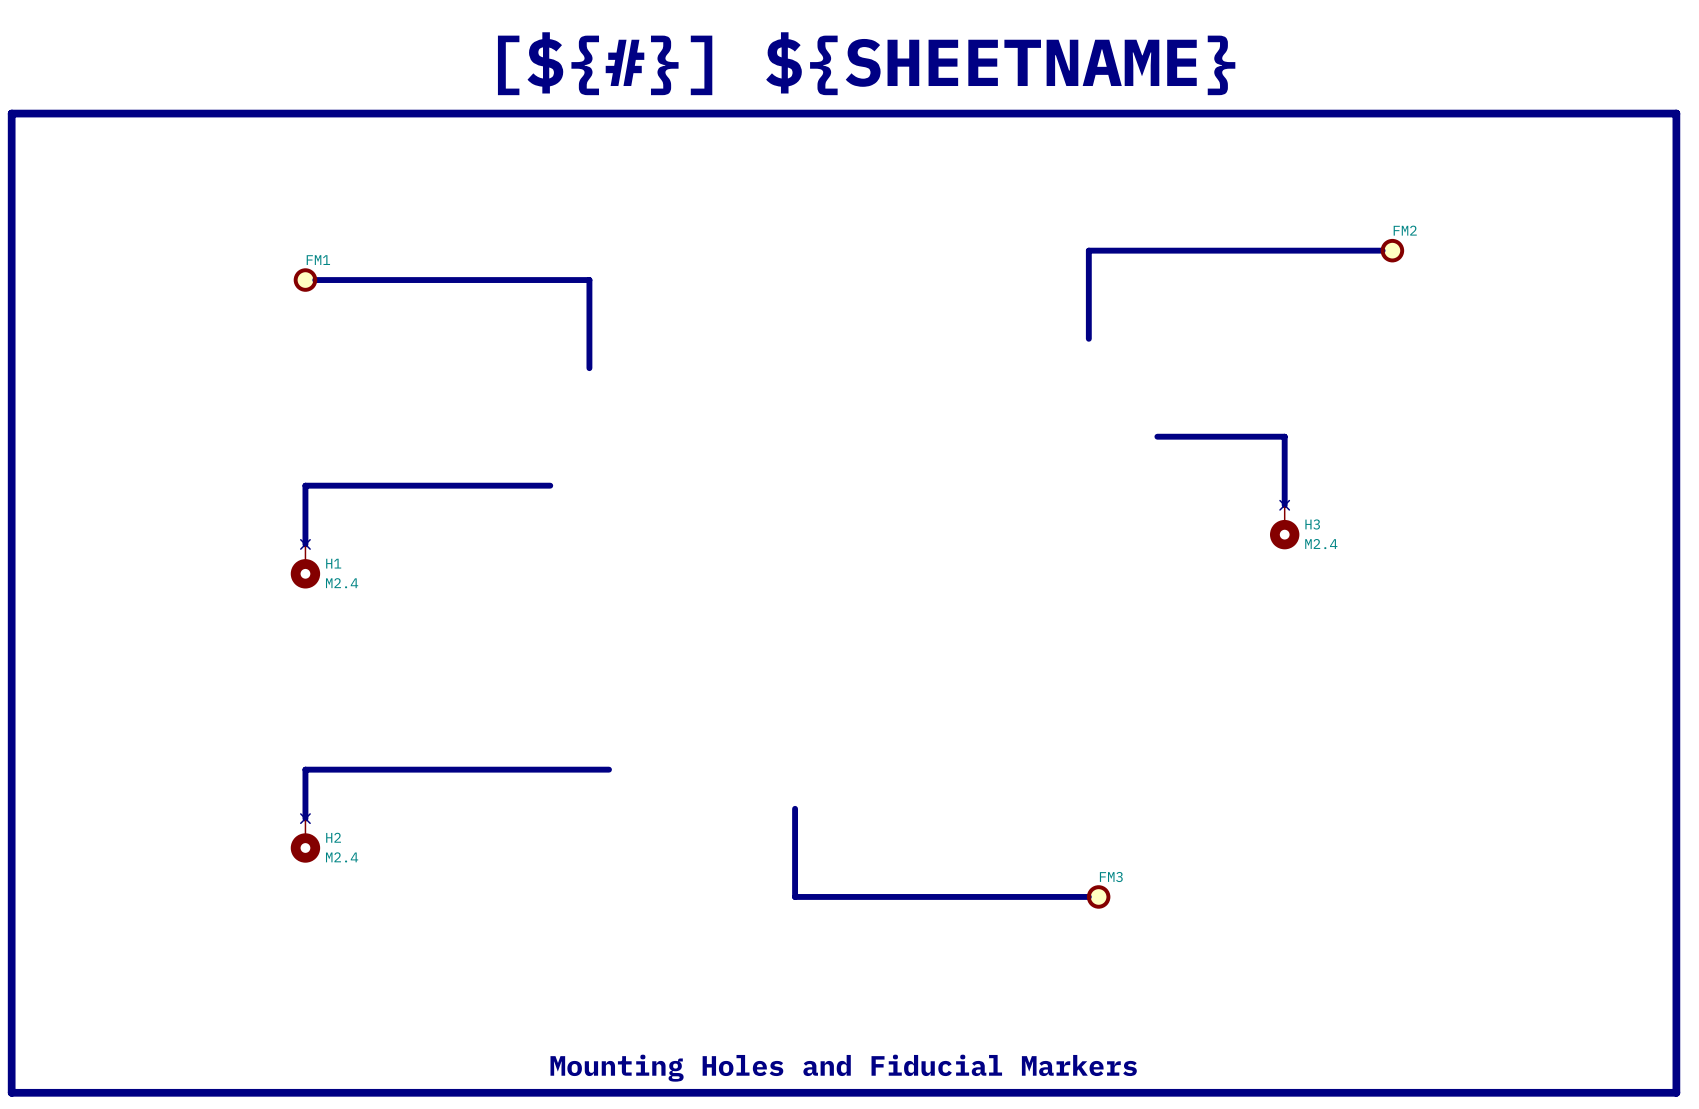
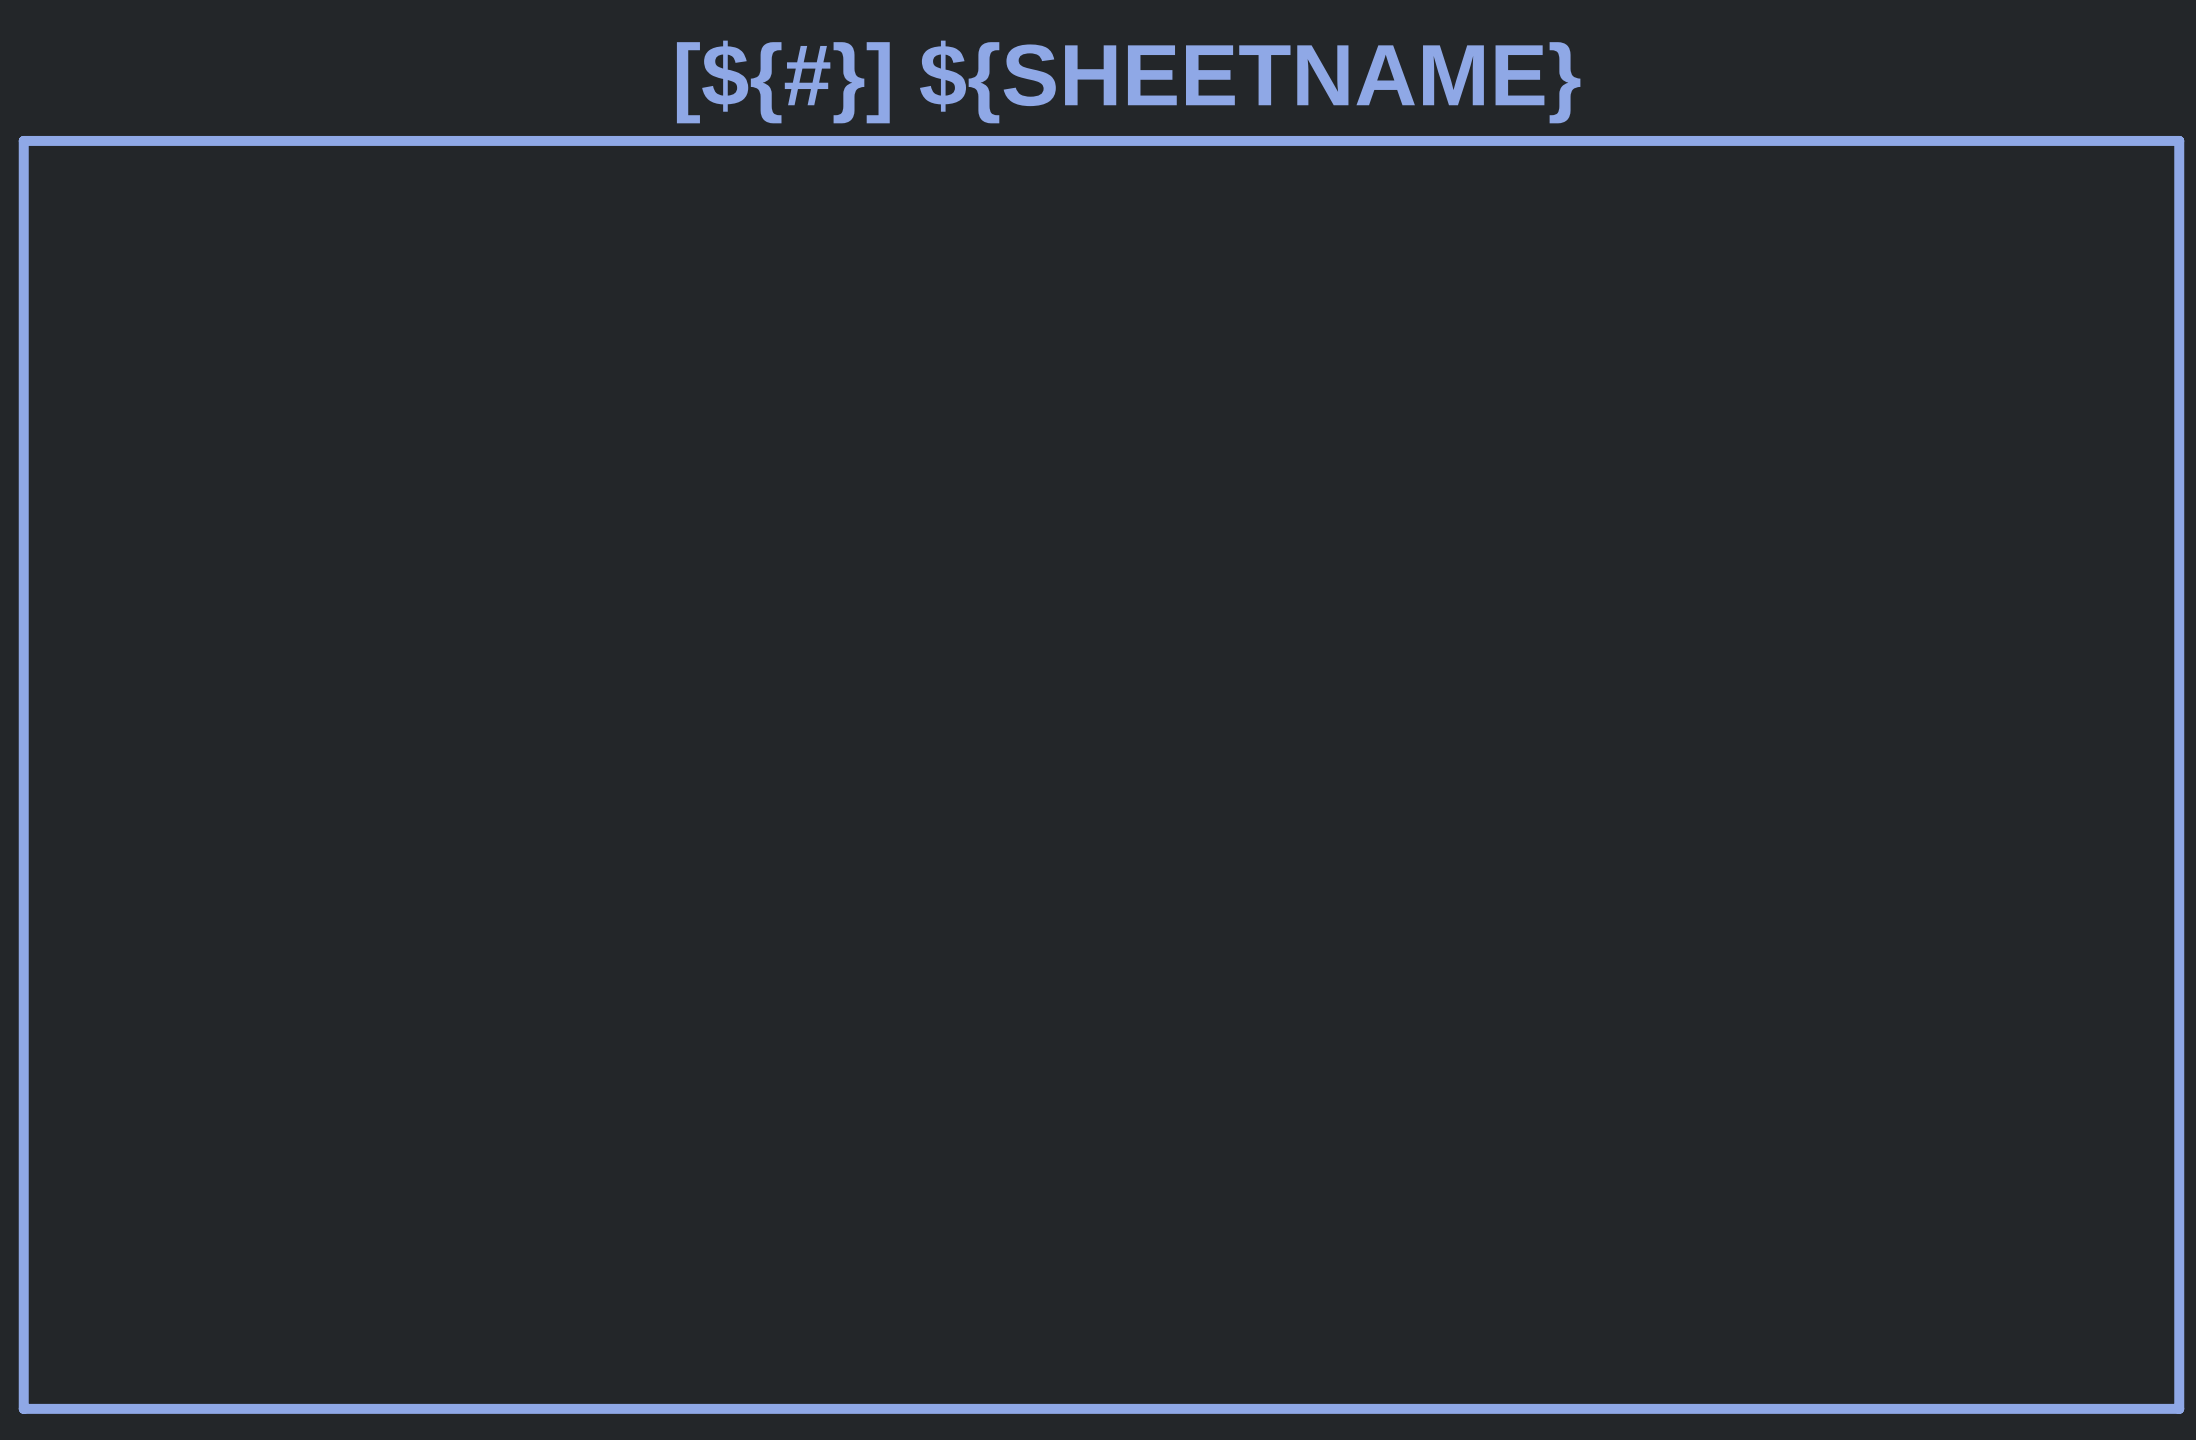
line: (1382, 250) (1088, 250) (1088, 338) -> none
FM2: (1392, 250) -> none
FM1: (305, 280) -> none
line: (315, 280) (589, 280) (589, 368) -> none
line: (1157, 436) (1284, 436) (1284, 505) -> none
line: (550, 485) (305, 485) (305, 544) -> none
no-connect mark: (1284, 505) -> none
H3: M2.4 (1284, 527) -> none
no-connect mark: (305, 544) -> none
H1: M2.4 (305, 566) -> none
line: (609, 769) (305, 769) (305, 818) -> none
line: (795, 808) (795, 896) (1088, 896) -> none
no-connect mark: (305, 818) -> none
H2: M2.4 (305, 840) -> none
FM3: (1098, 896) -> none
text: Mounting Holes and Fiducial Markers (843, 1068) -> none

